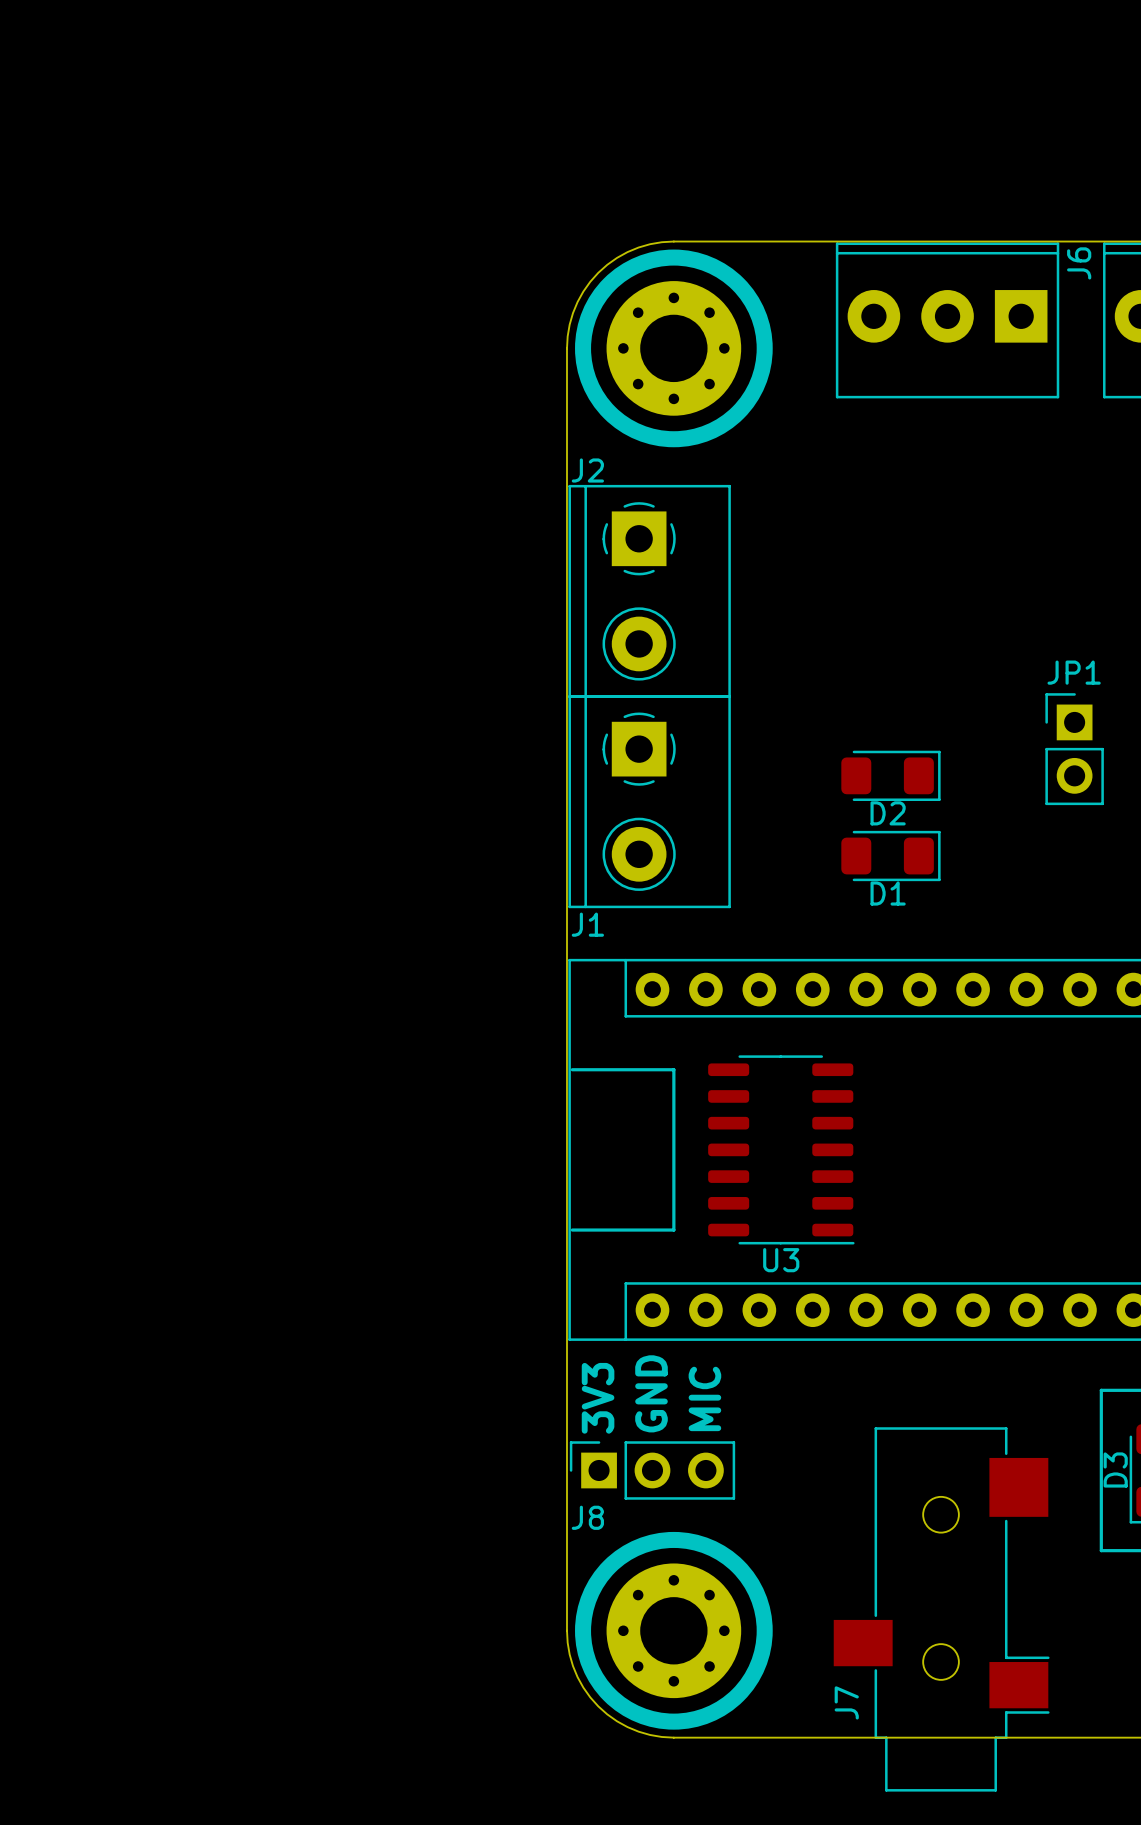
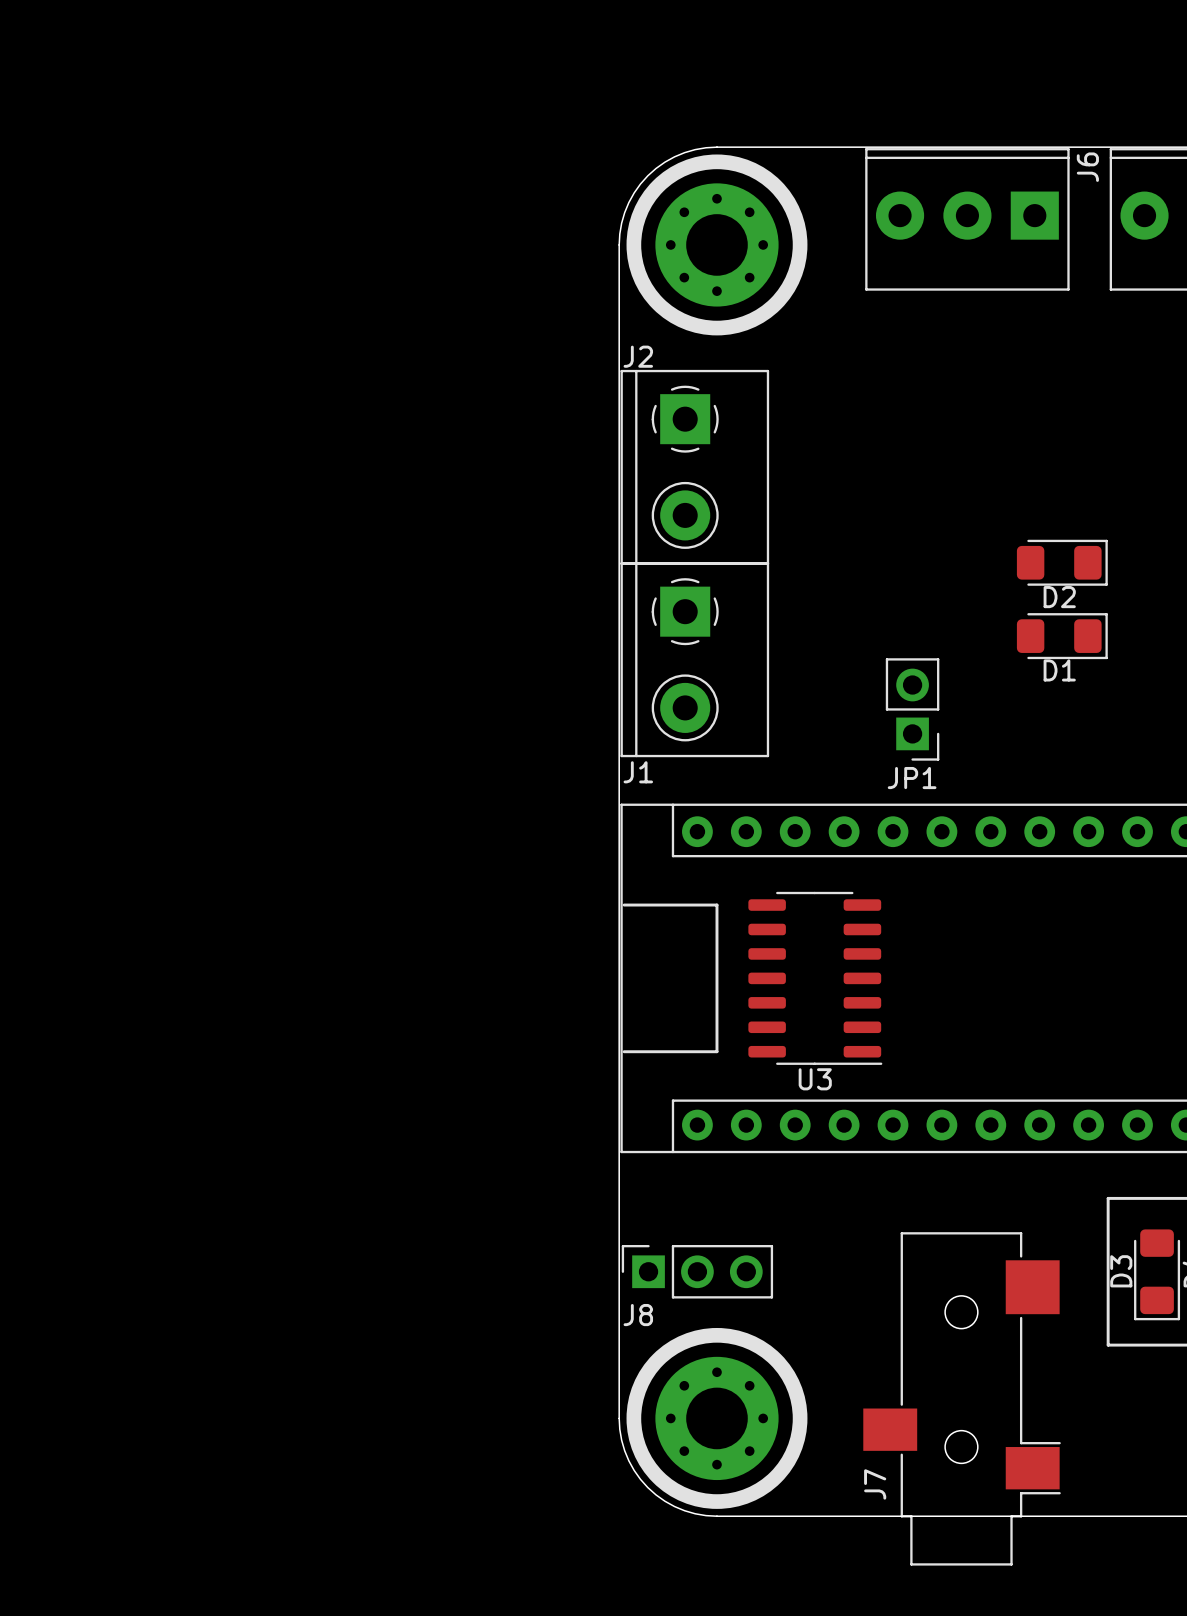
JP1 rotation: 0° (1074, 749) -> 180° (912, 709)
JP1 position: (1074, 749) -> (912, 709)
D2 position: (890, 775) -> (1062, 562)
D1 position: (890, 856) -> (1062, 636)
text: GND (651, 1393) -> none
text: 3V3 (598, 1398) -> none
text: MIC (704, 1398) -> none

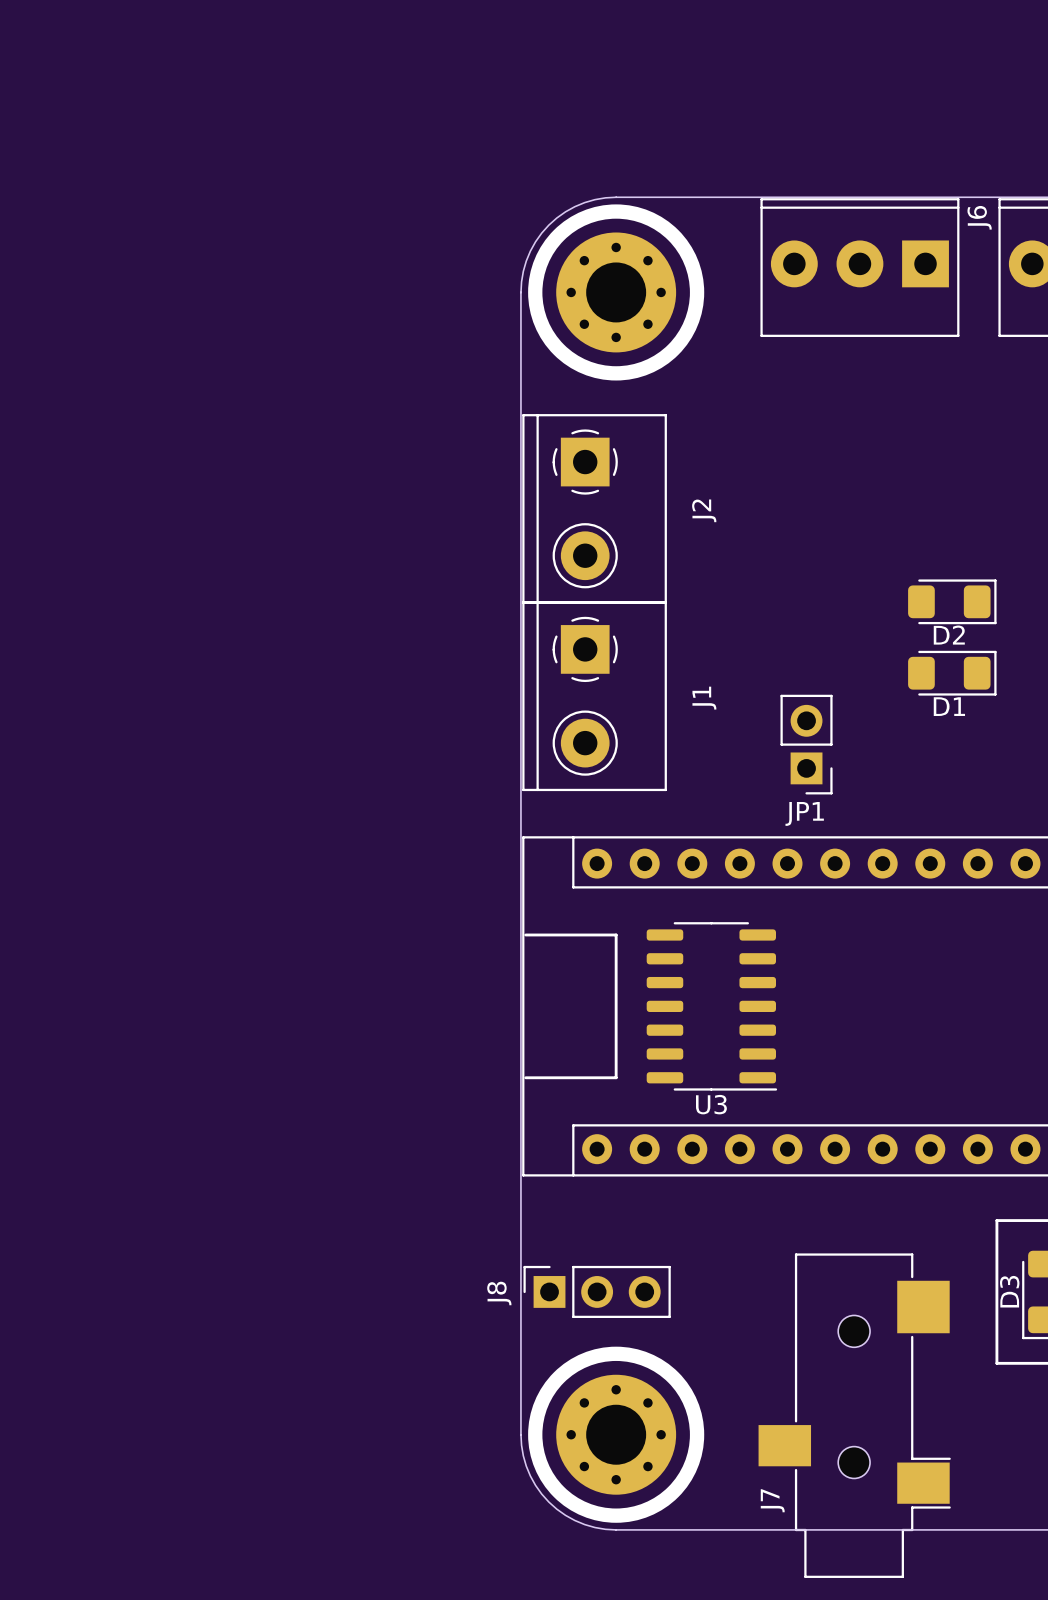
J2 name rotation: 0° (638, 356) -> 90° counterclockwise (704, 510)
J2 name position: J2 (638, 356) -> J2 (704, 510)
J1 name rotation: 0° (638, 772) -> 90° counterclockwise (704, 698)
J1 name position: J1 (638, 772) -> J1 (704, 698)
J8 name rotation: 0° (638, 1315) -> 90° counterclockwise (499, 1293)
J8 name position: J8 (638, 1315) -> J8 (499, 1293)

